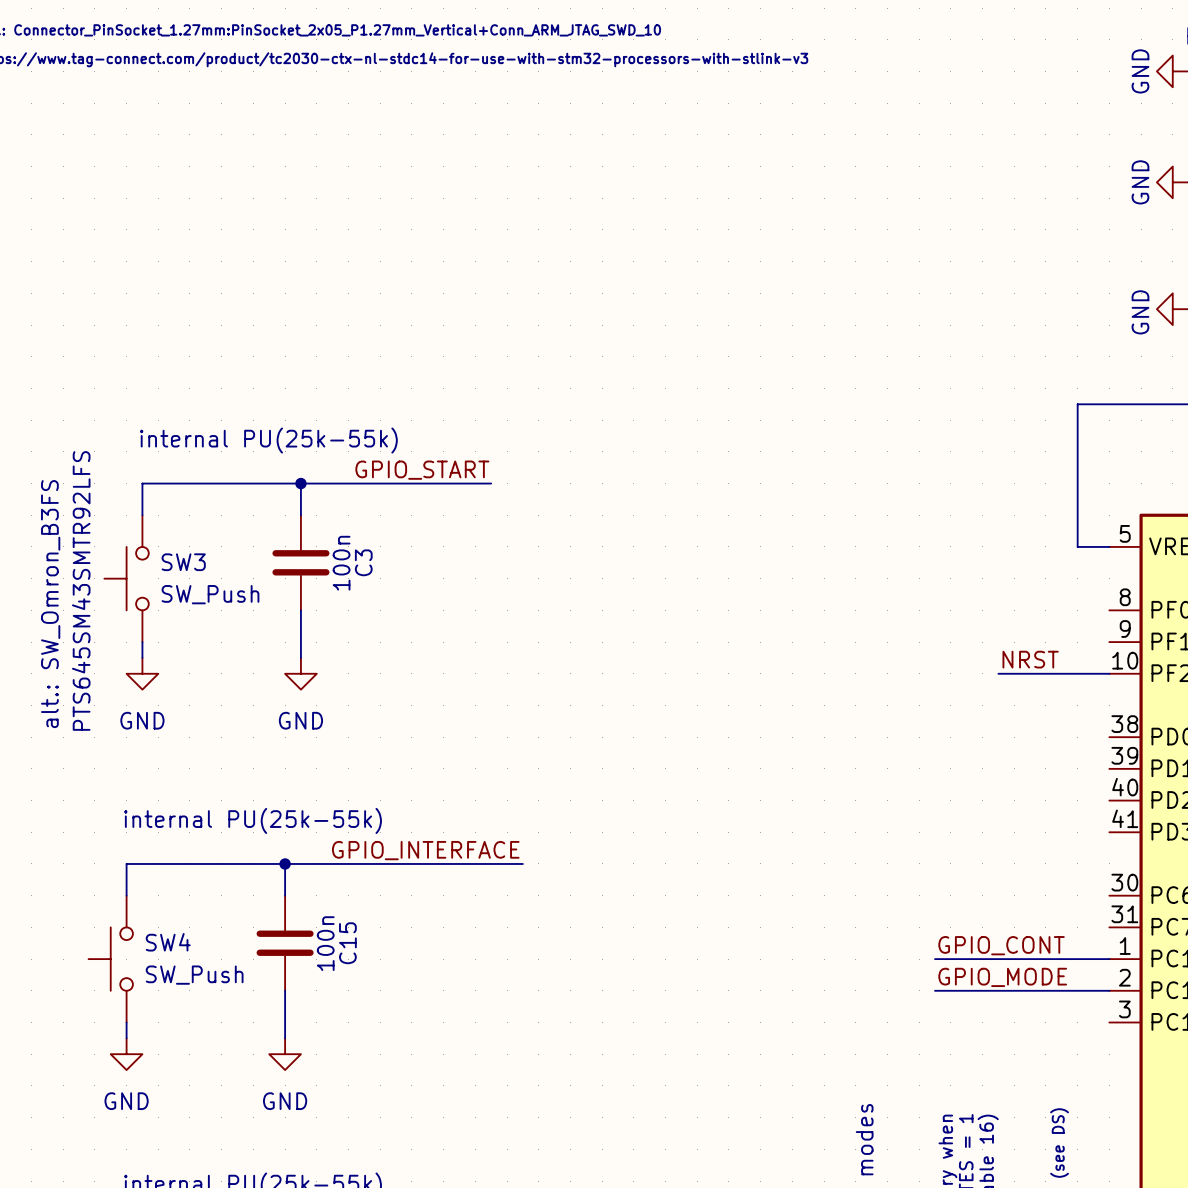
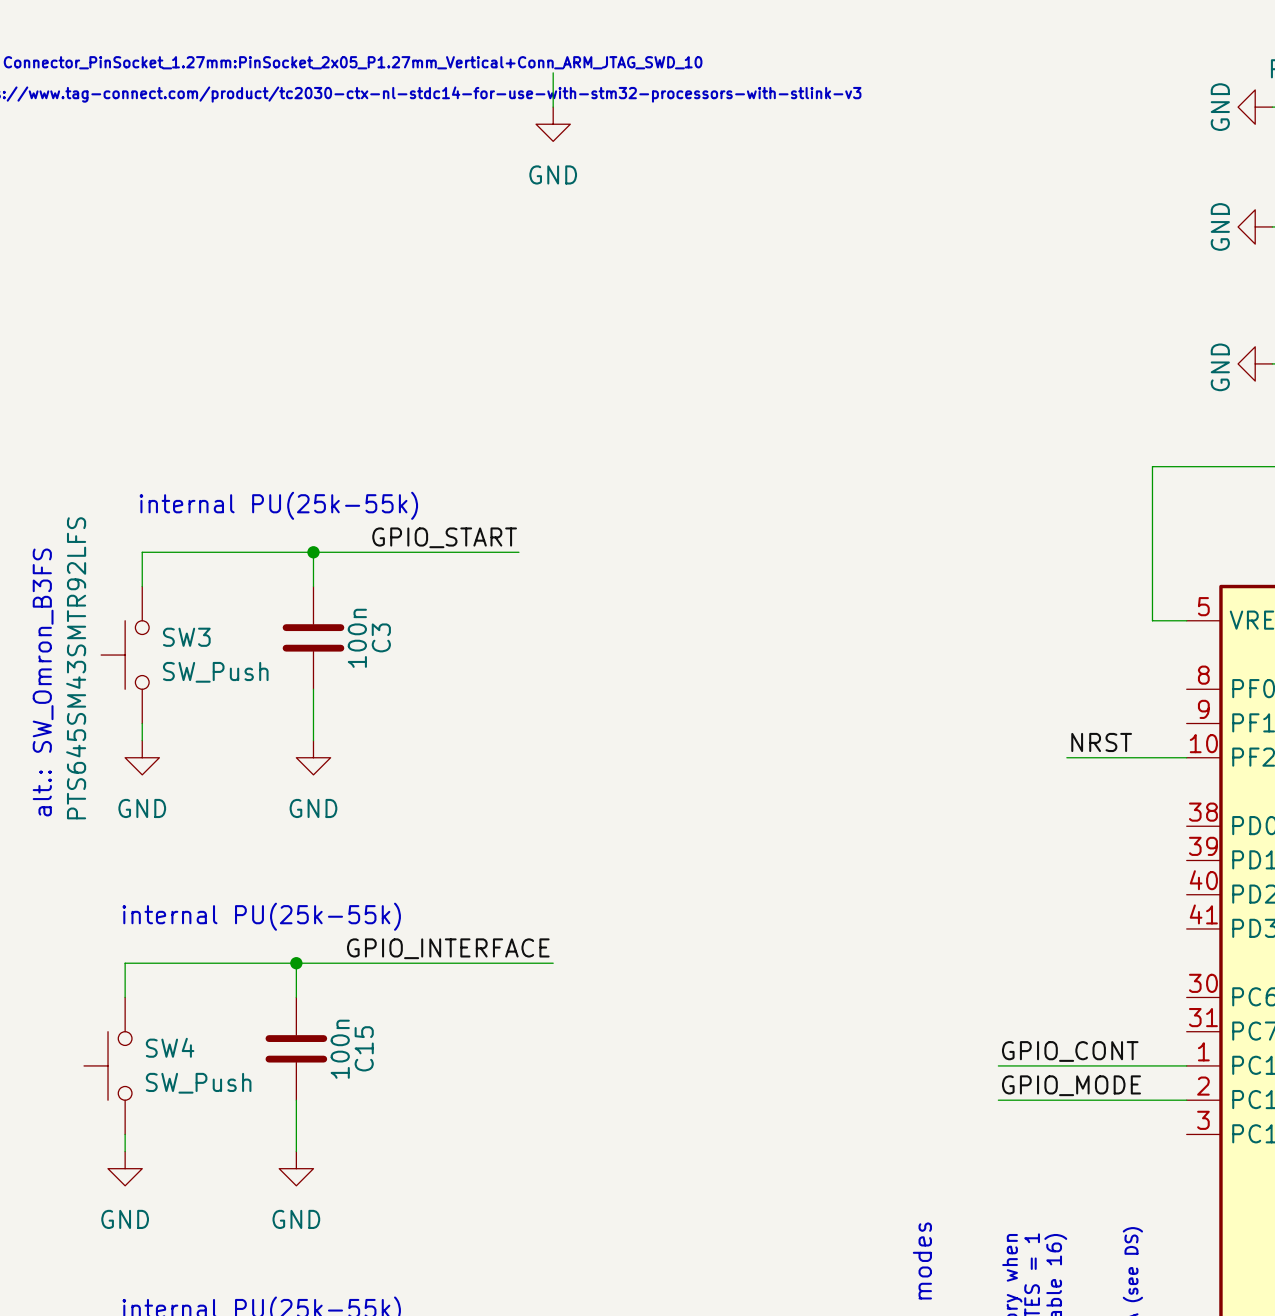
wire: none -> (553, 72) (553, 107)
power symbol: none -> GND (553, 124)

